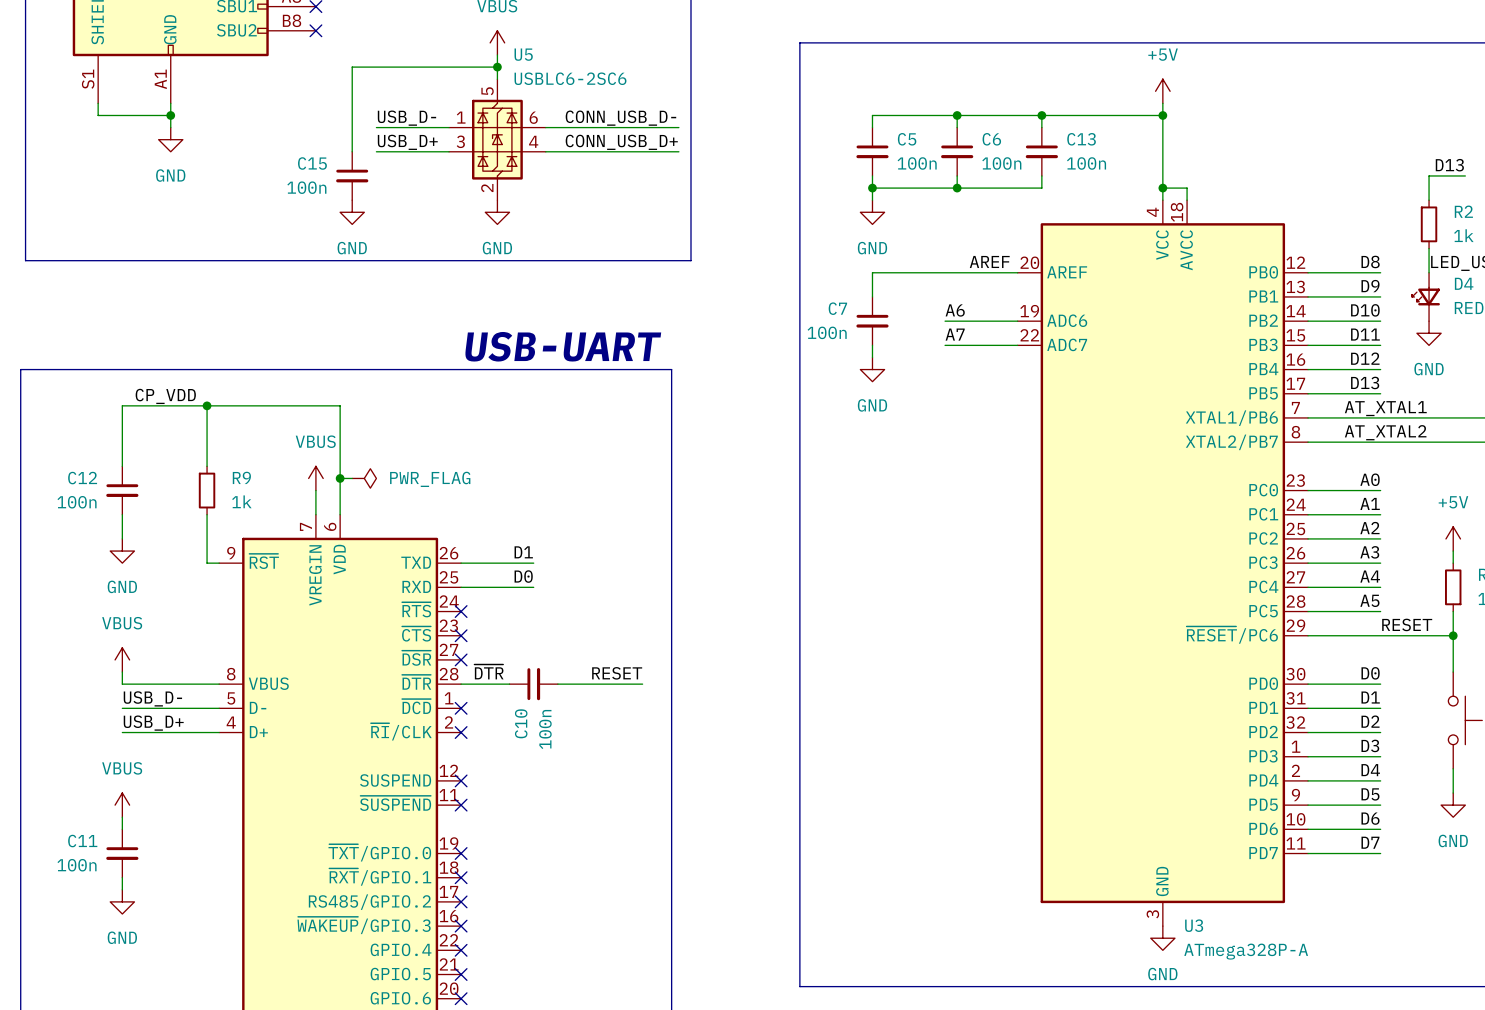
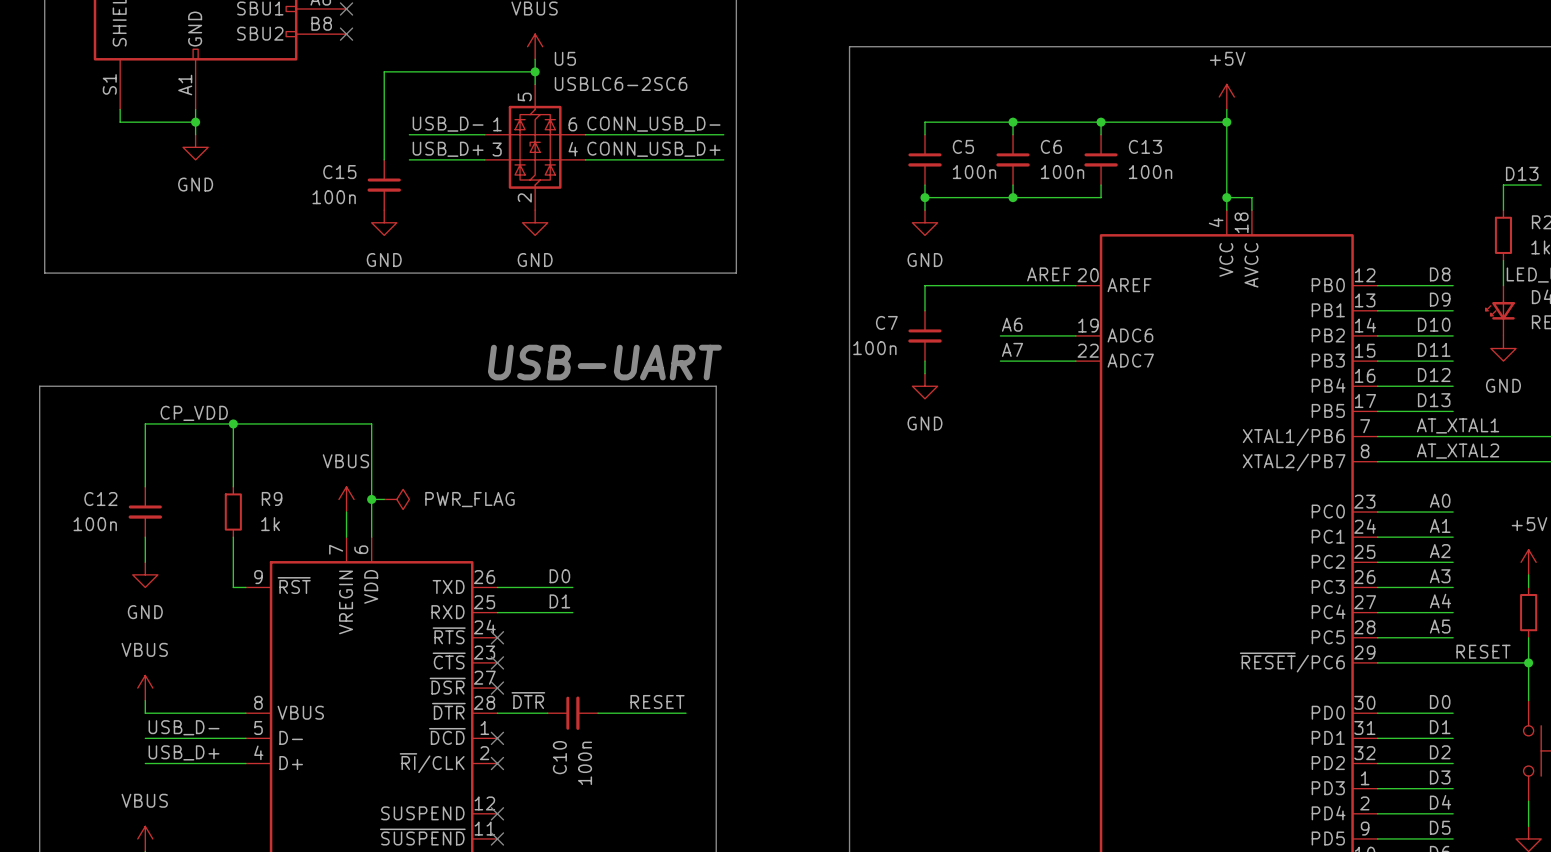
label: D1 (523, 552) -> D0 (559, 576)
label: D0 (523, 576) -> D1 (559, 601)

